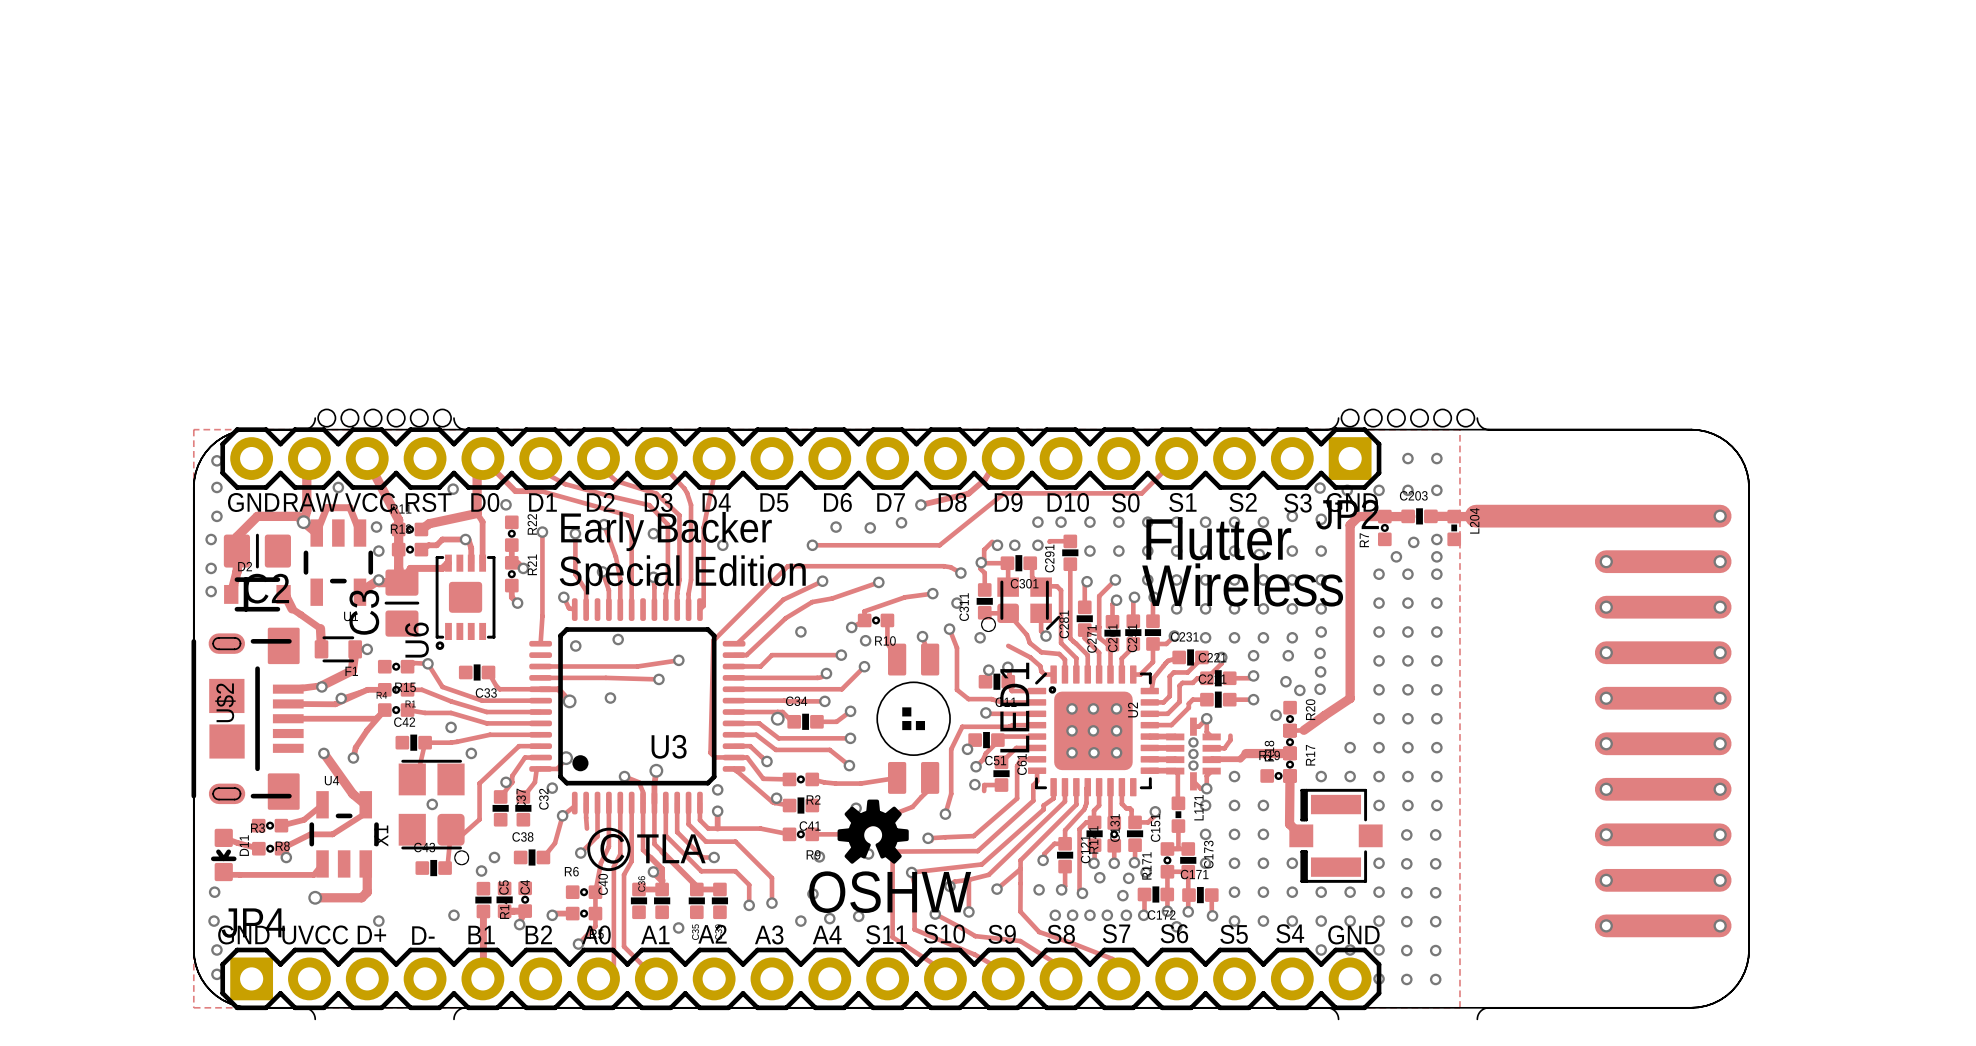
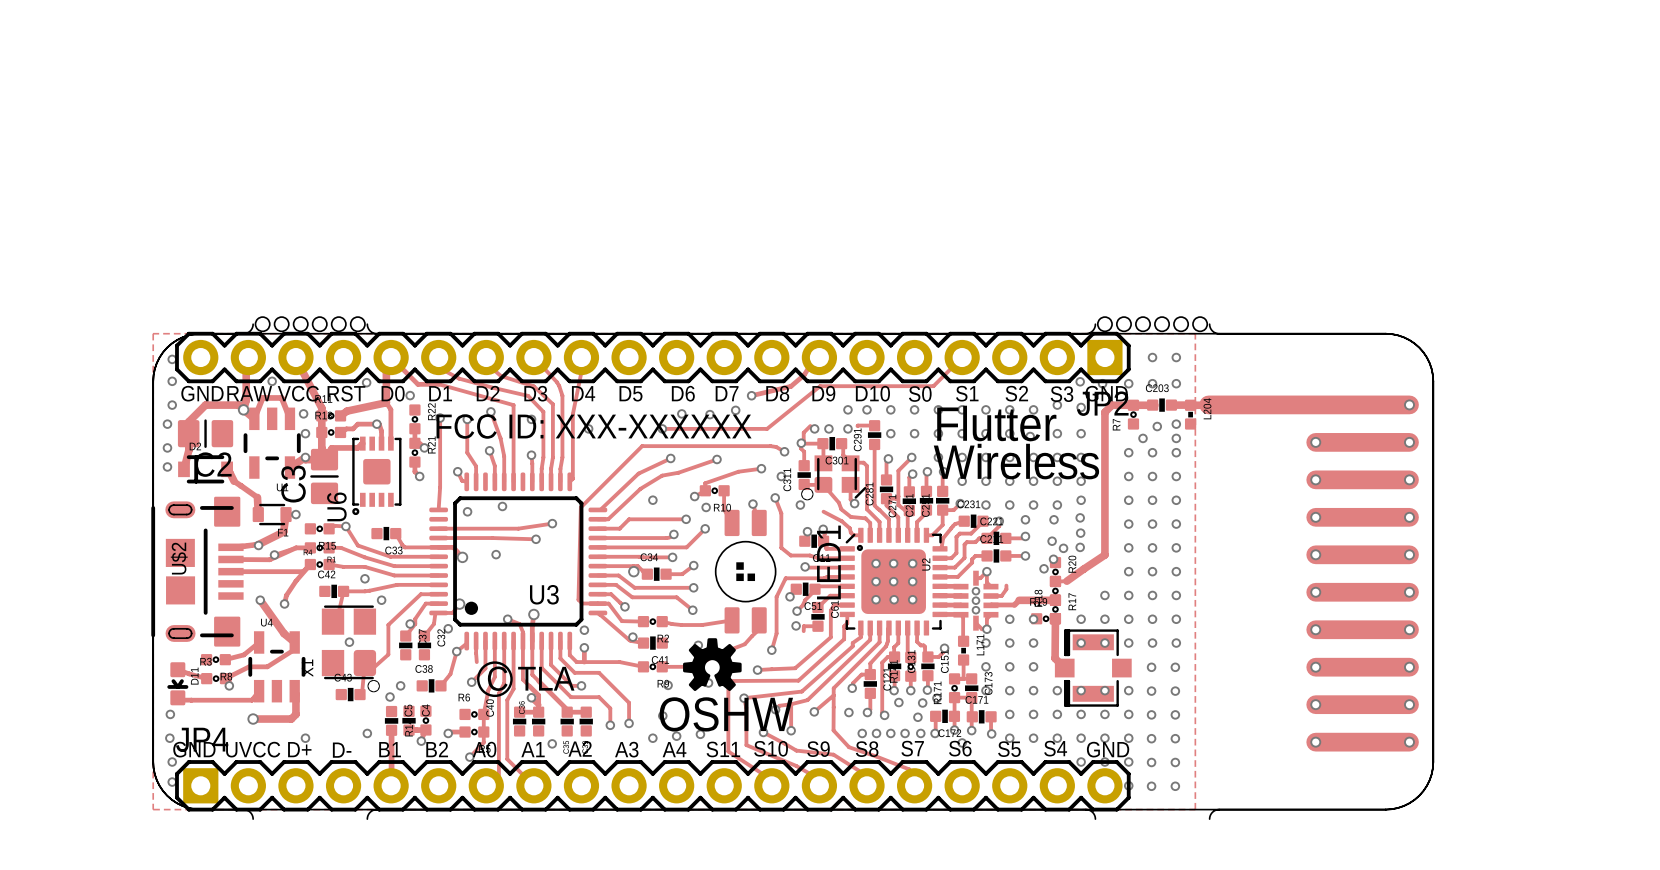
text: Early Backer (666, 531) -> none
text: none -> FCC ID: XXX-XXXXXX (594, 426)
text: Special Edition (682, 574) -> none
via: none -> (1053, 559)
via: none -> (1033, 619)
via: none -> (1081, 643)
via: none -> (1104, 643)
via: none -> (1081, 690)
via: none -> (1104, 690)

